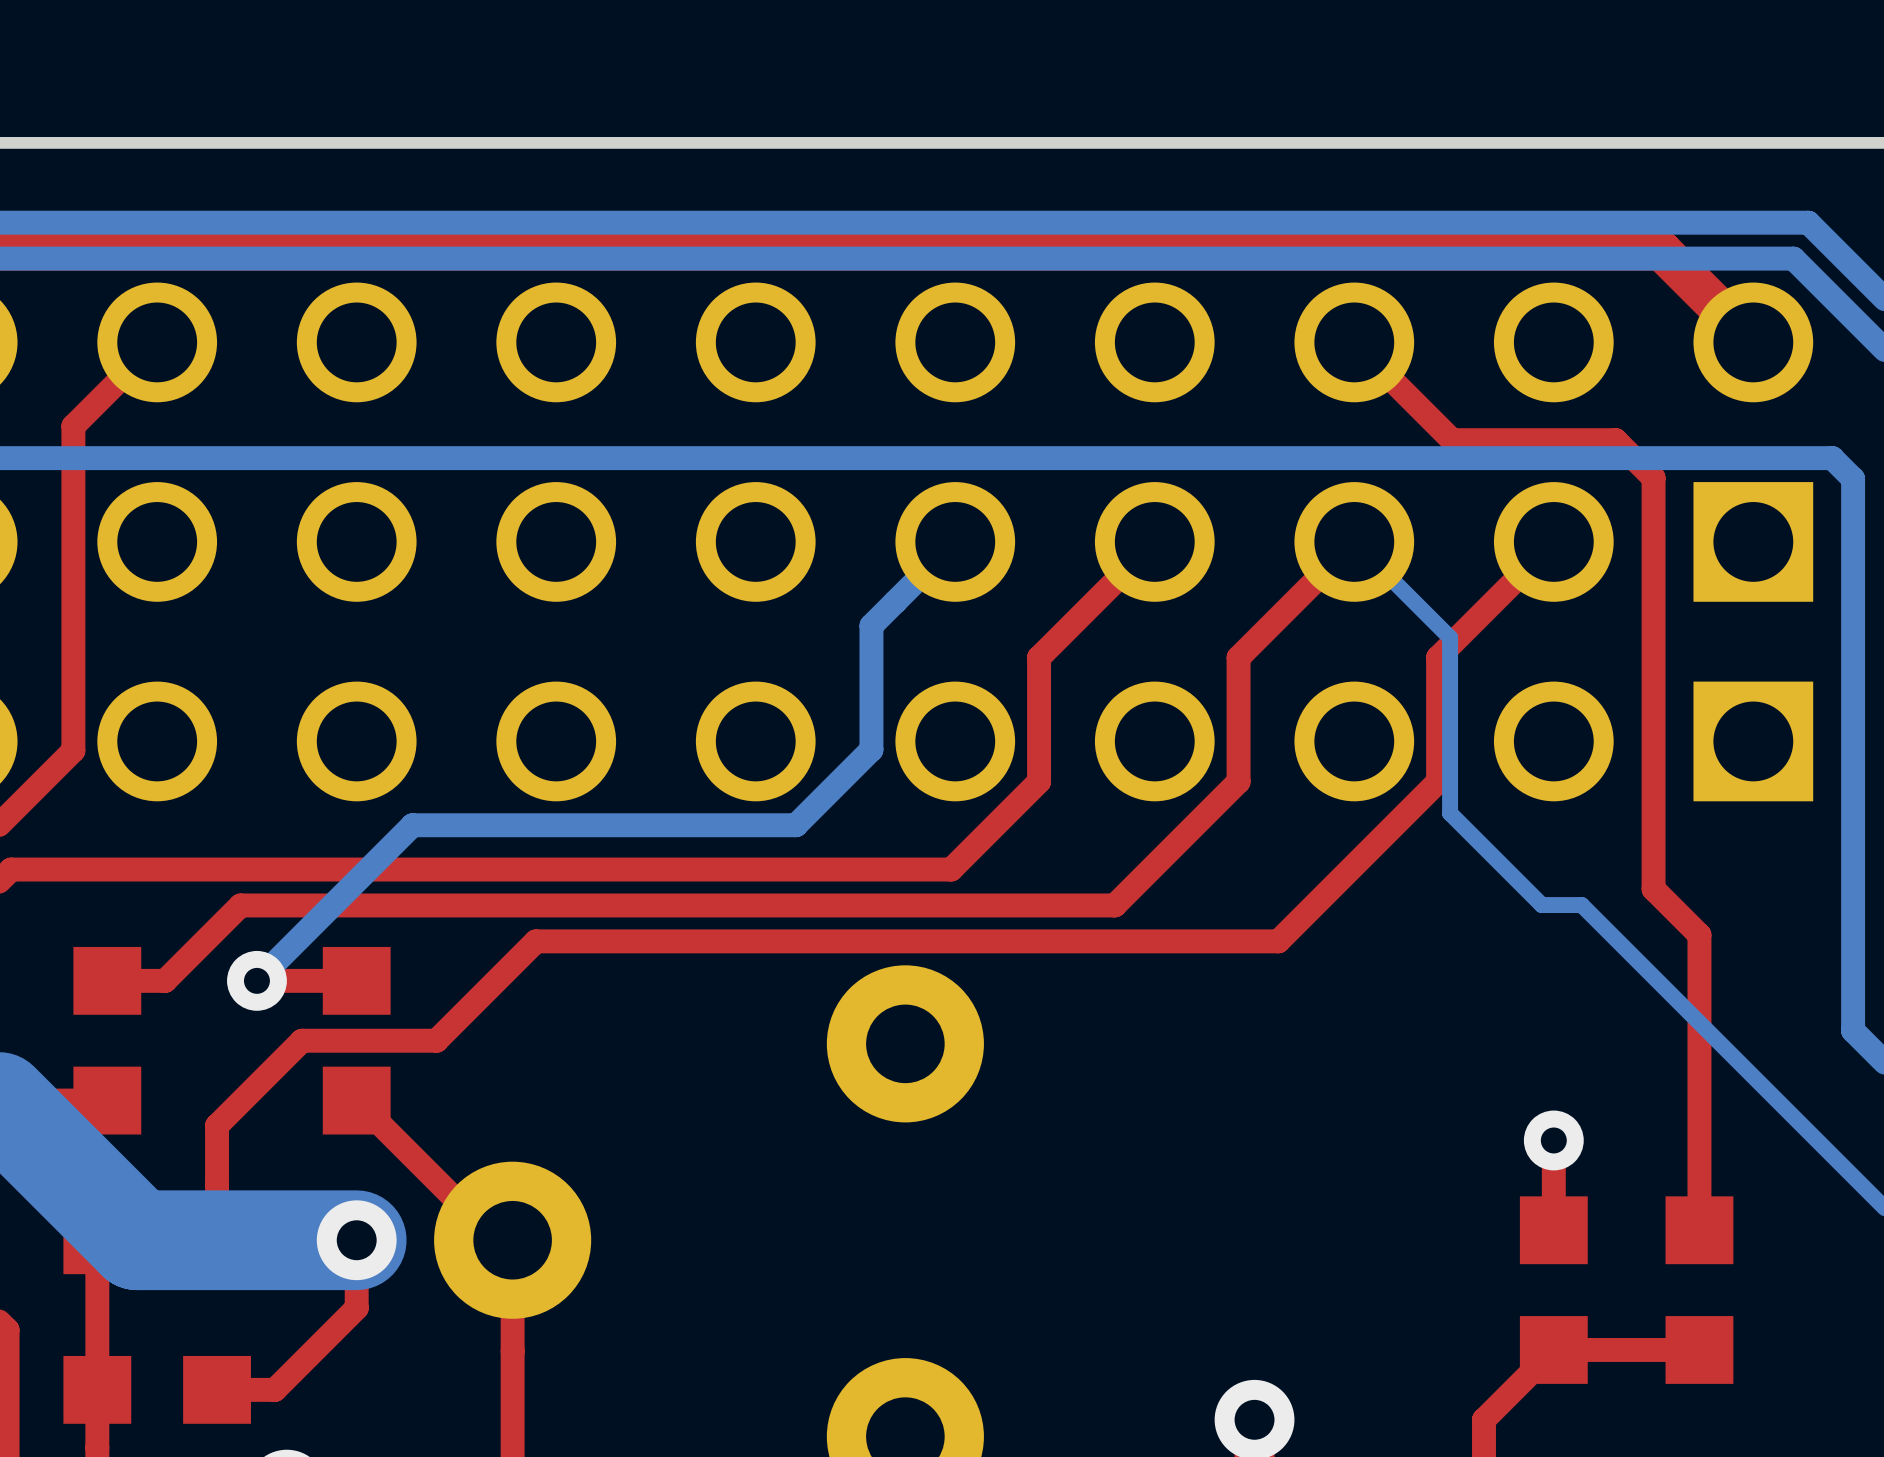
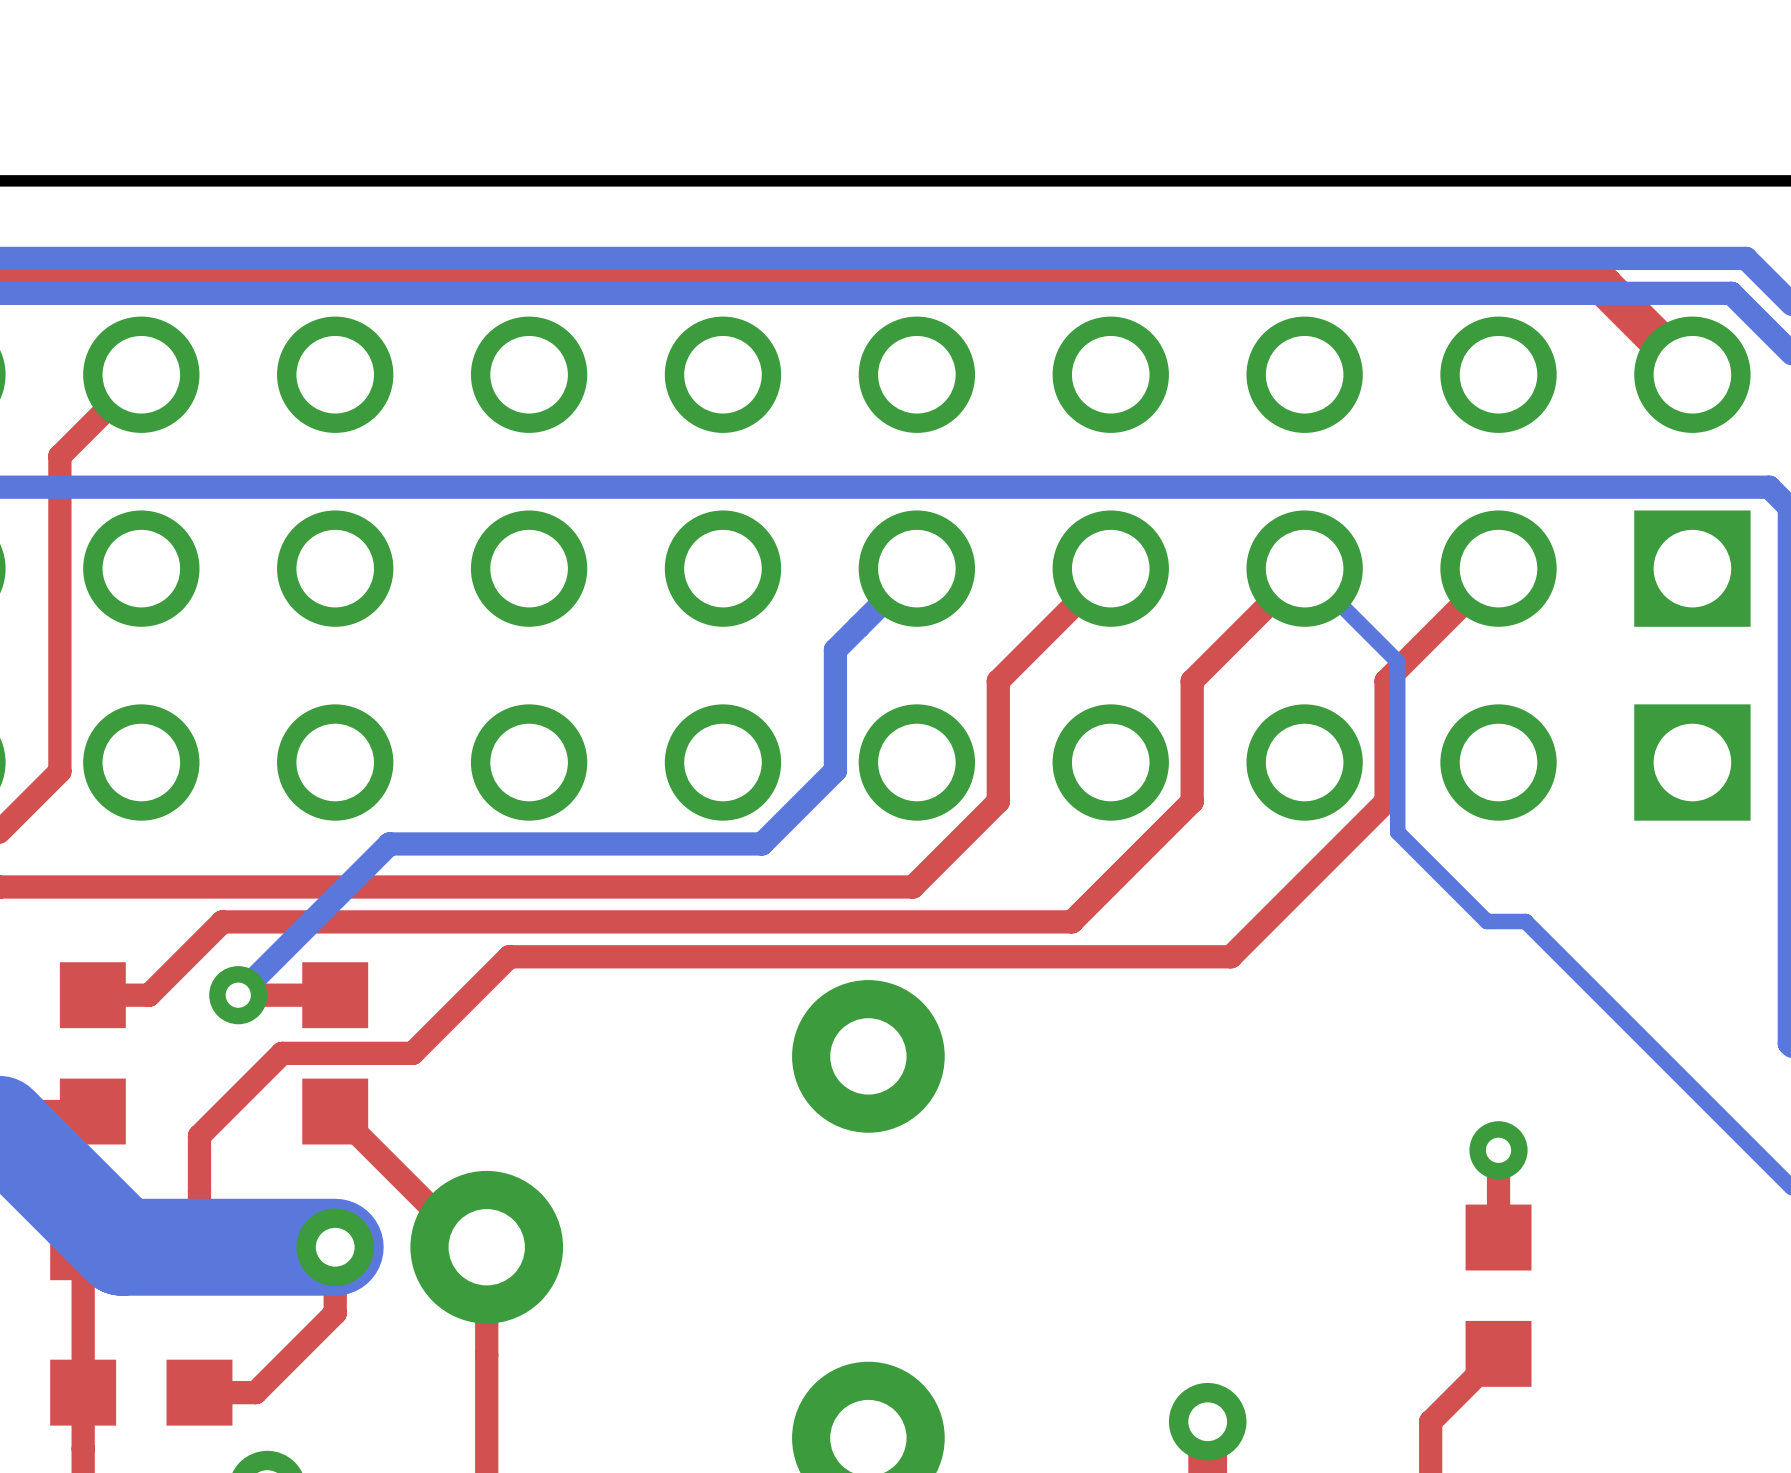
top track: (1354, 342) (1452, 440) (1615, 440) (1653, 478) (1653, 889) (1699, 934) (1699, 1230) -> none
part: (1699, 1290) -> none
top track: (1699, 1349) (1553, 1349) -> none

